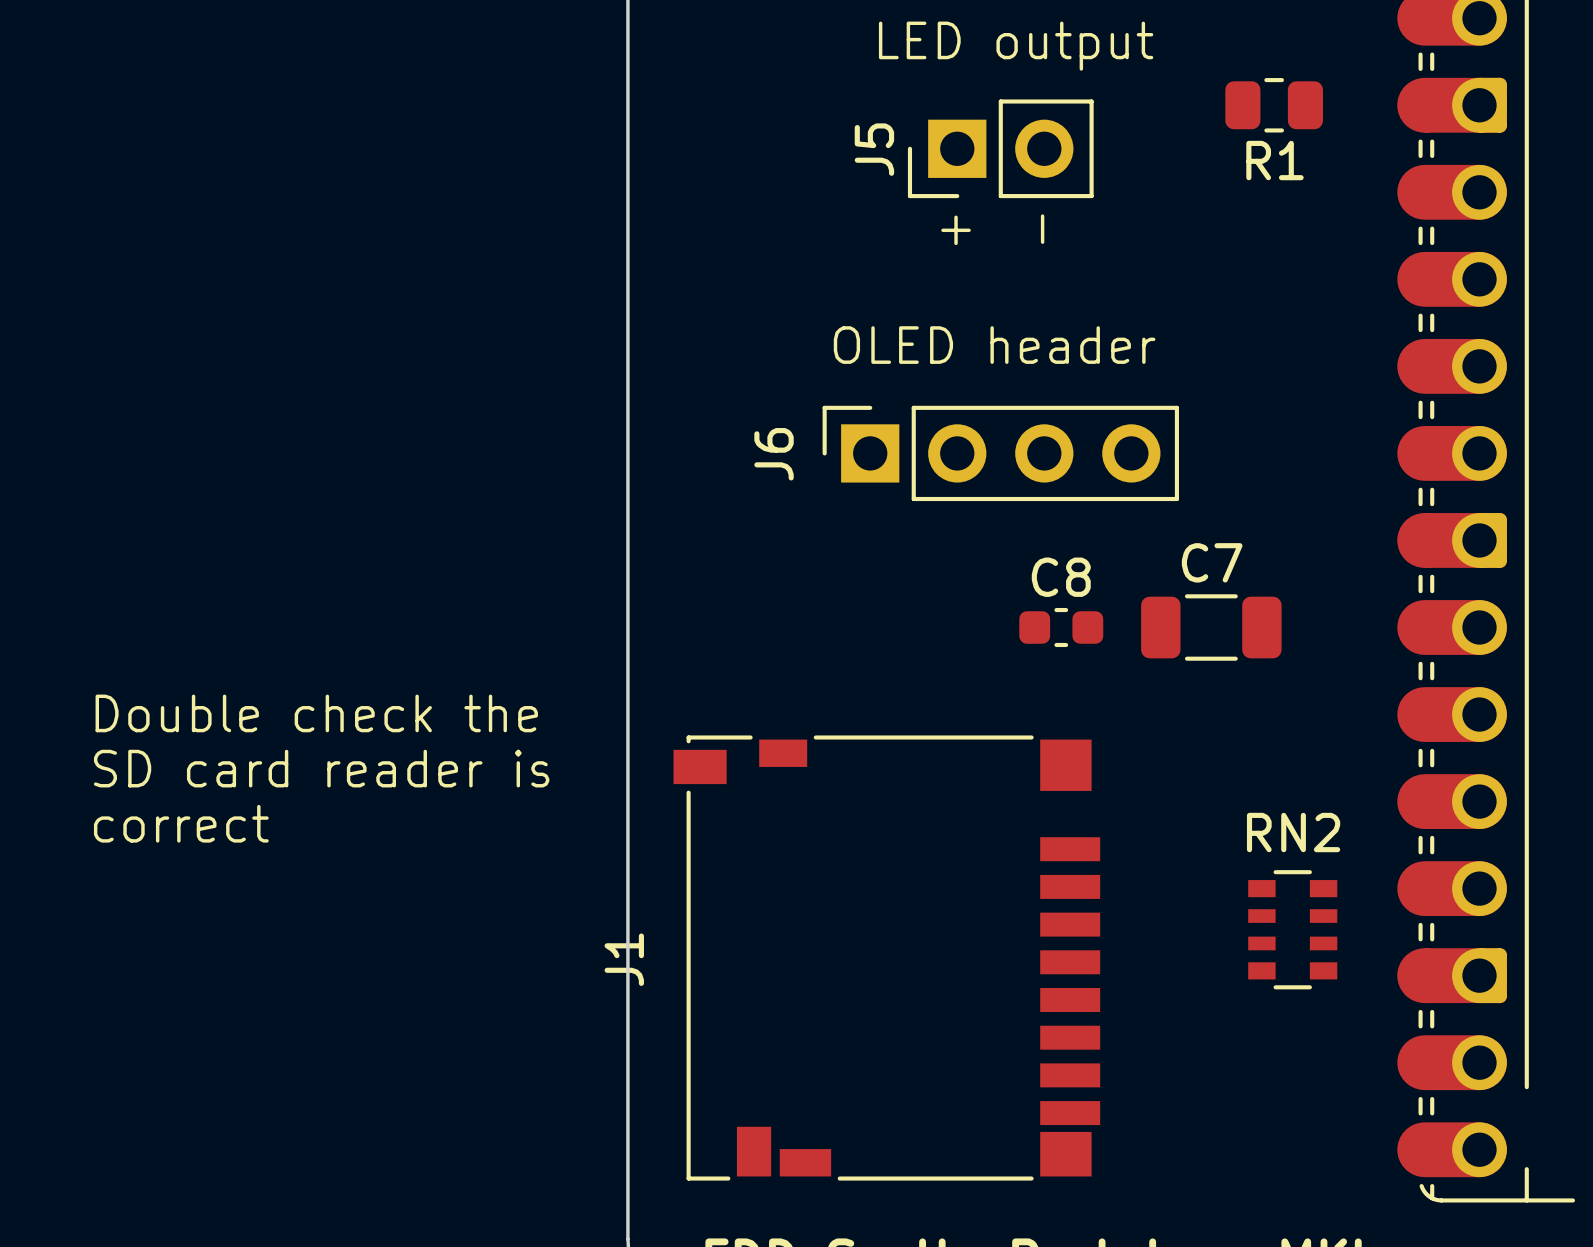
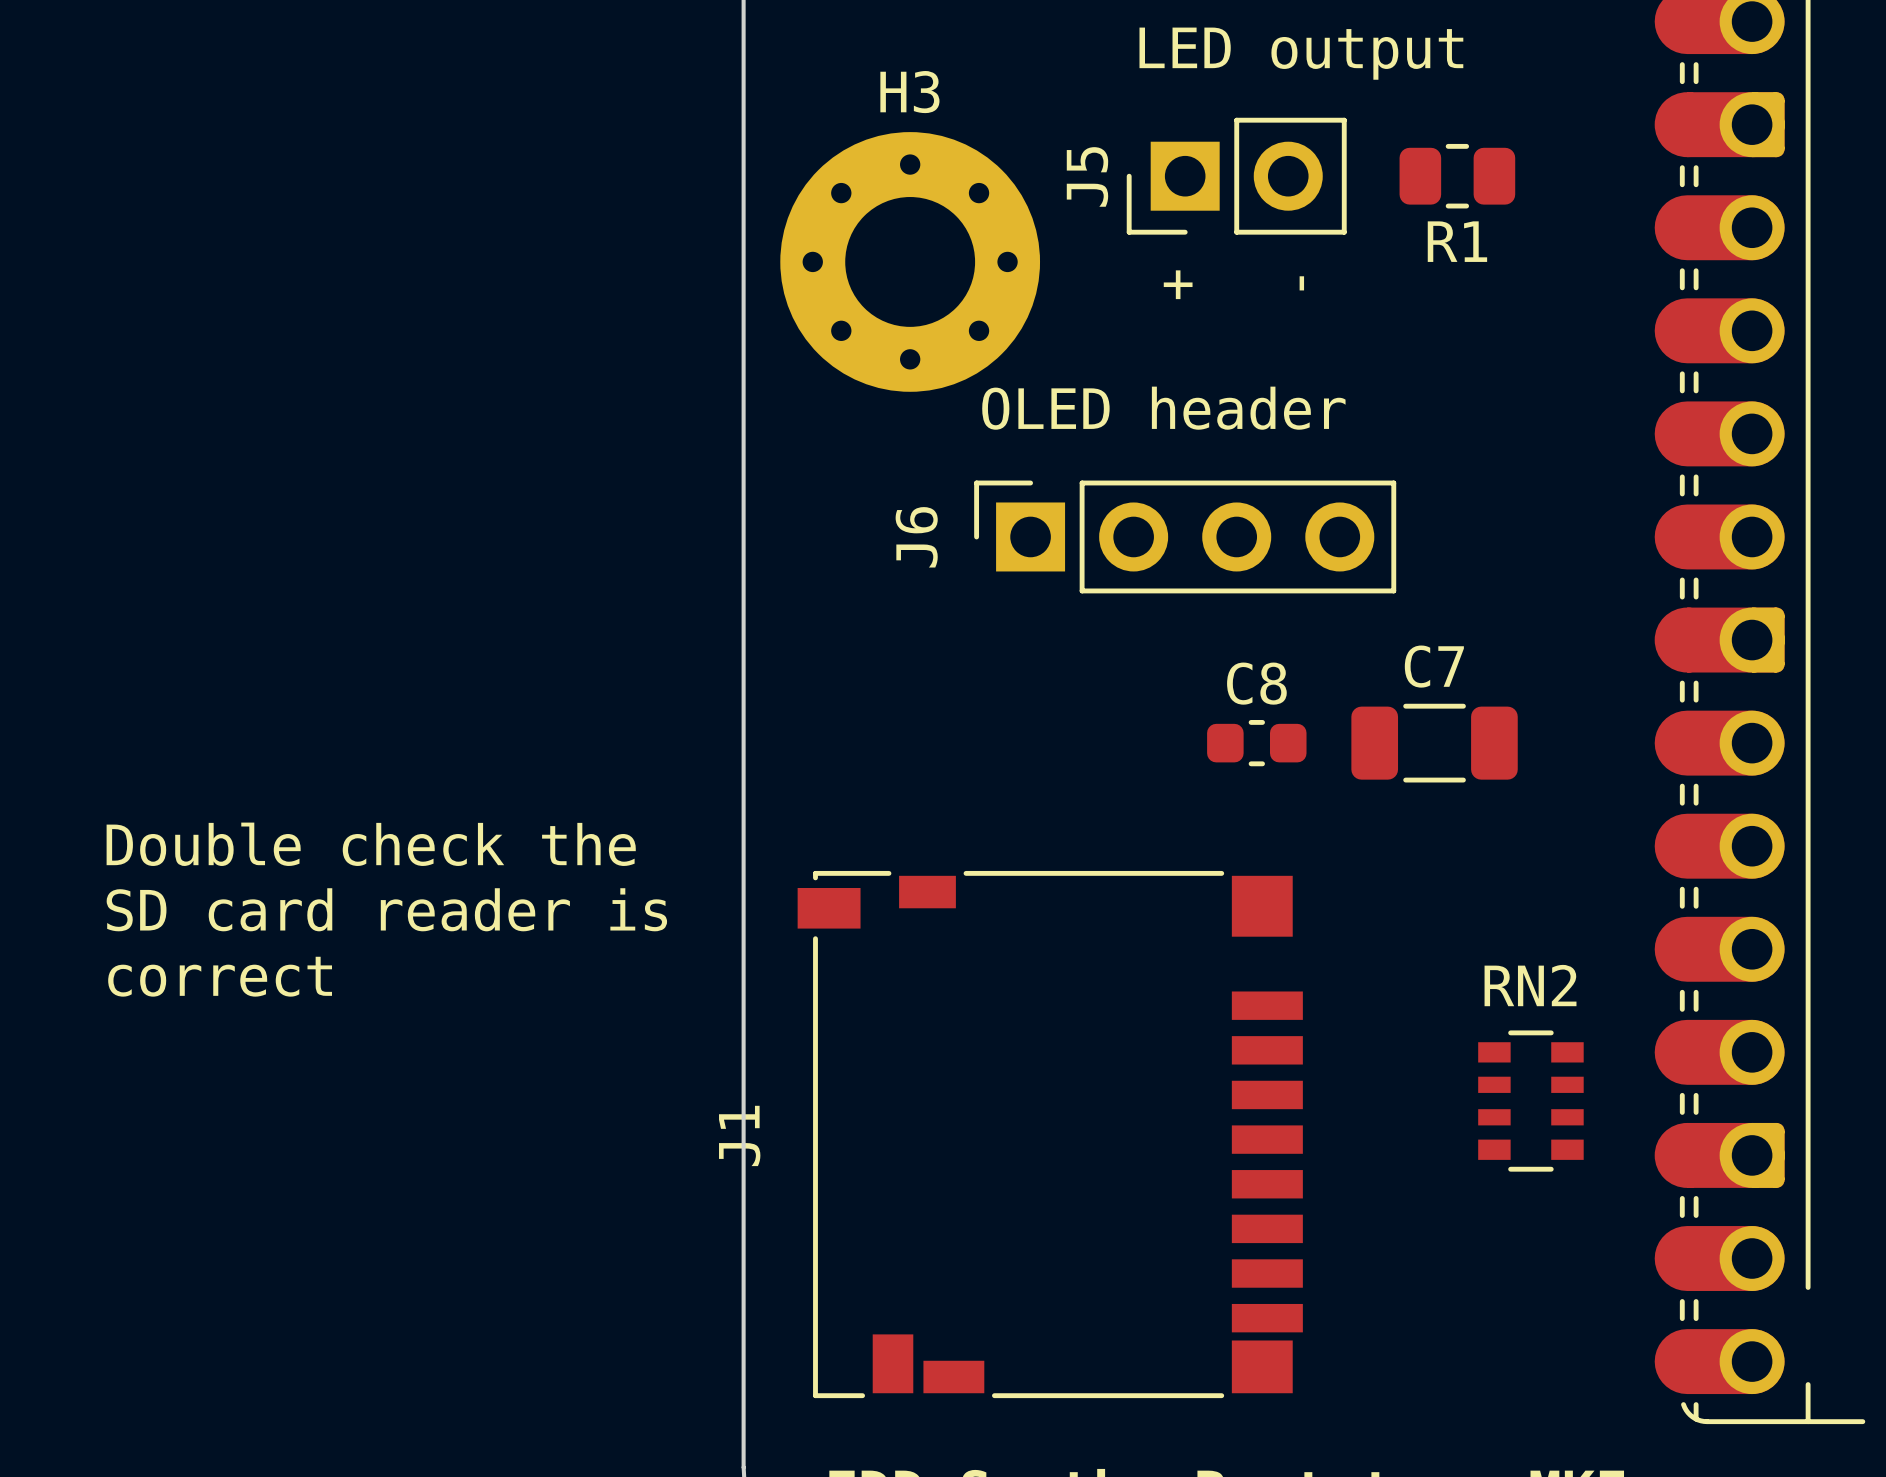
text position: LED output (1016, 46) -> LED output (1301, 53)
R1 position: (1274, 105) -> (1457, 176)
J5 position: (1000, 148) -> (1236, 176)
H3: none -> (910, 261)
text position: - (1042, 229) -> - (1301, 283)
text position: + (956, 230) -> + (1178, 284)

